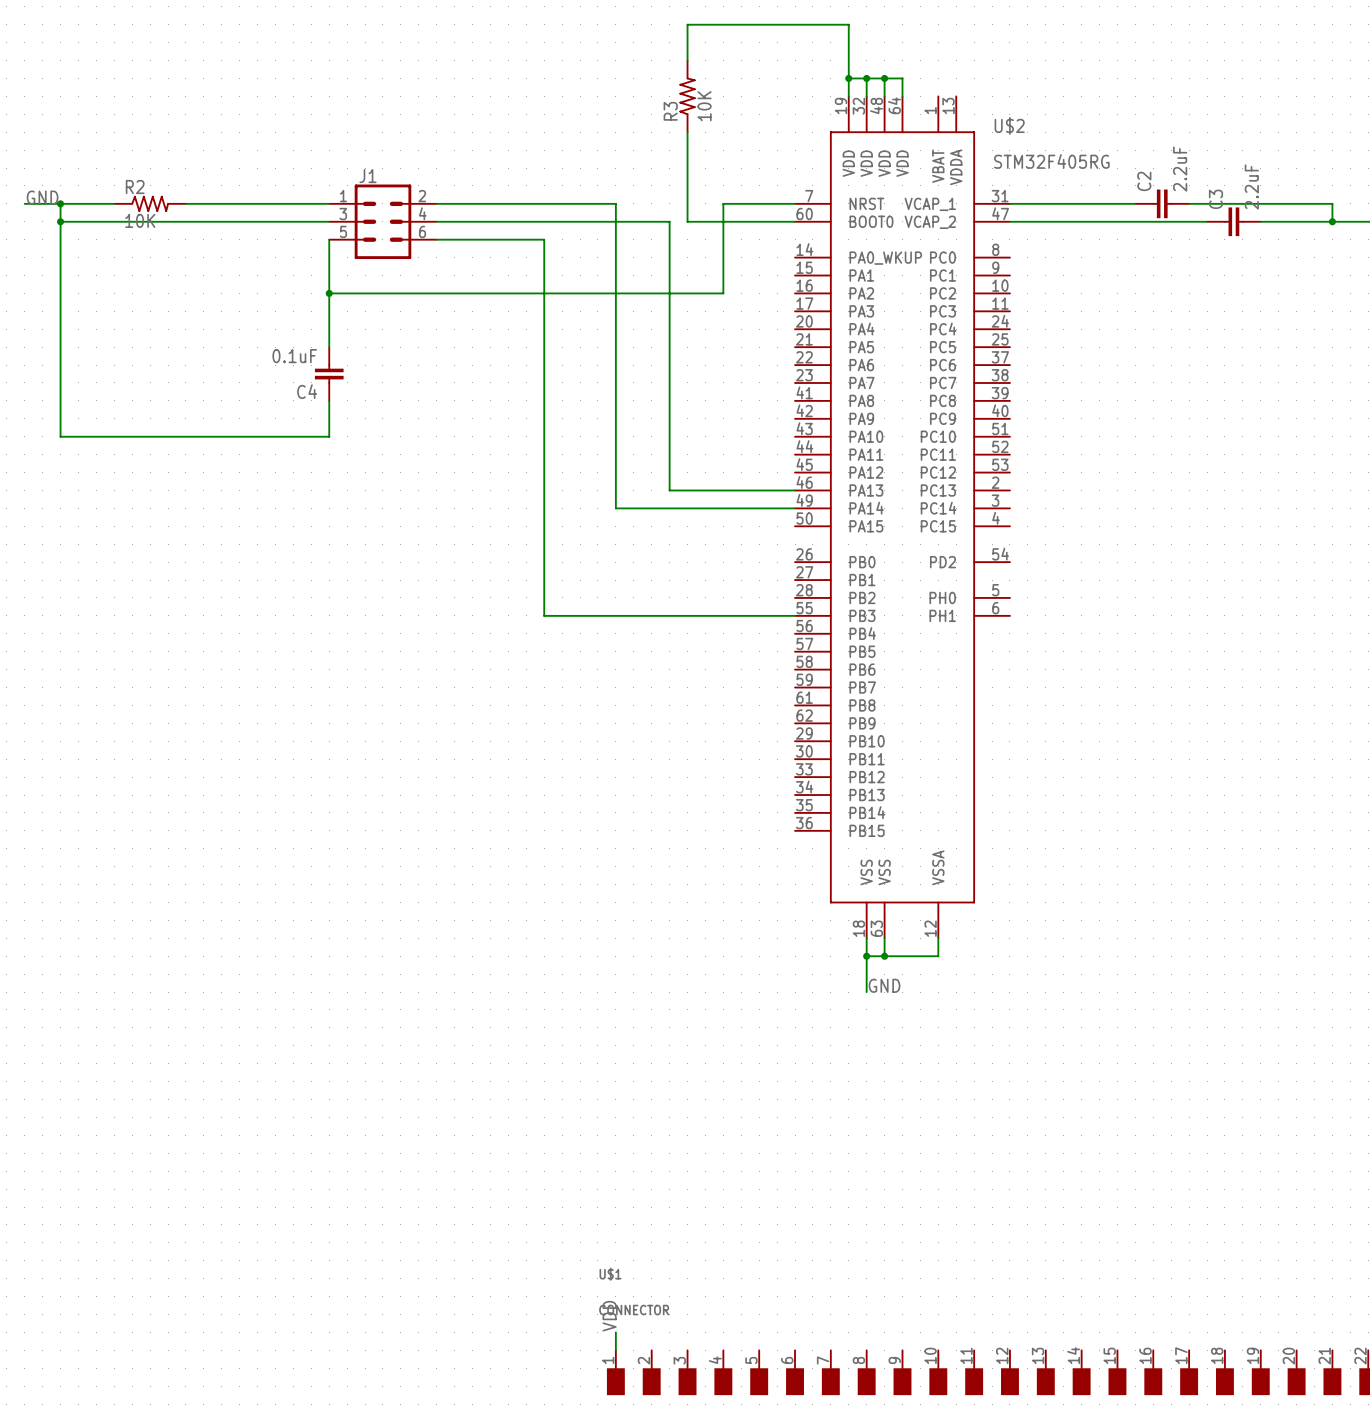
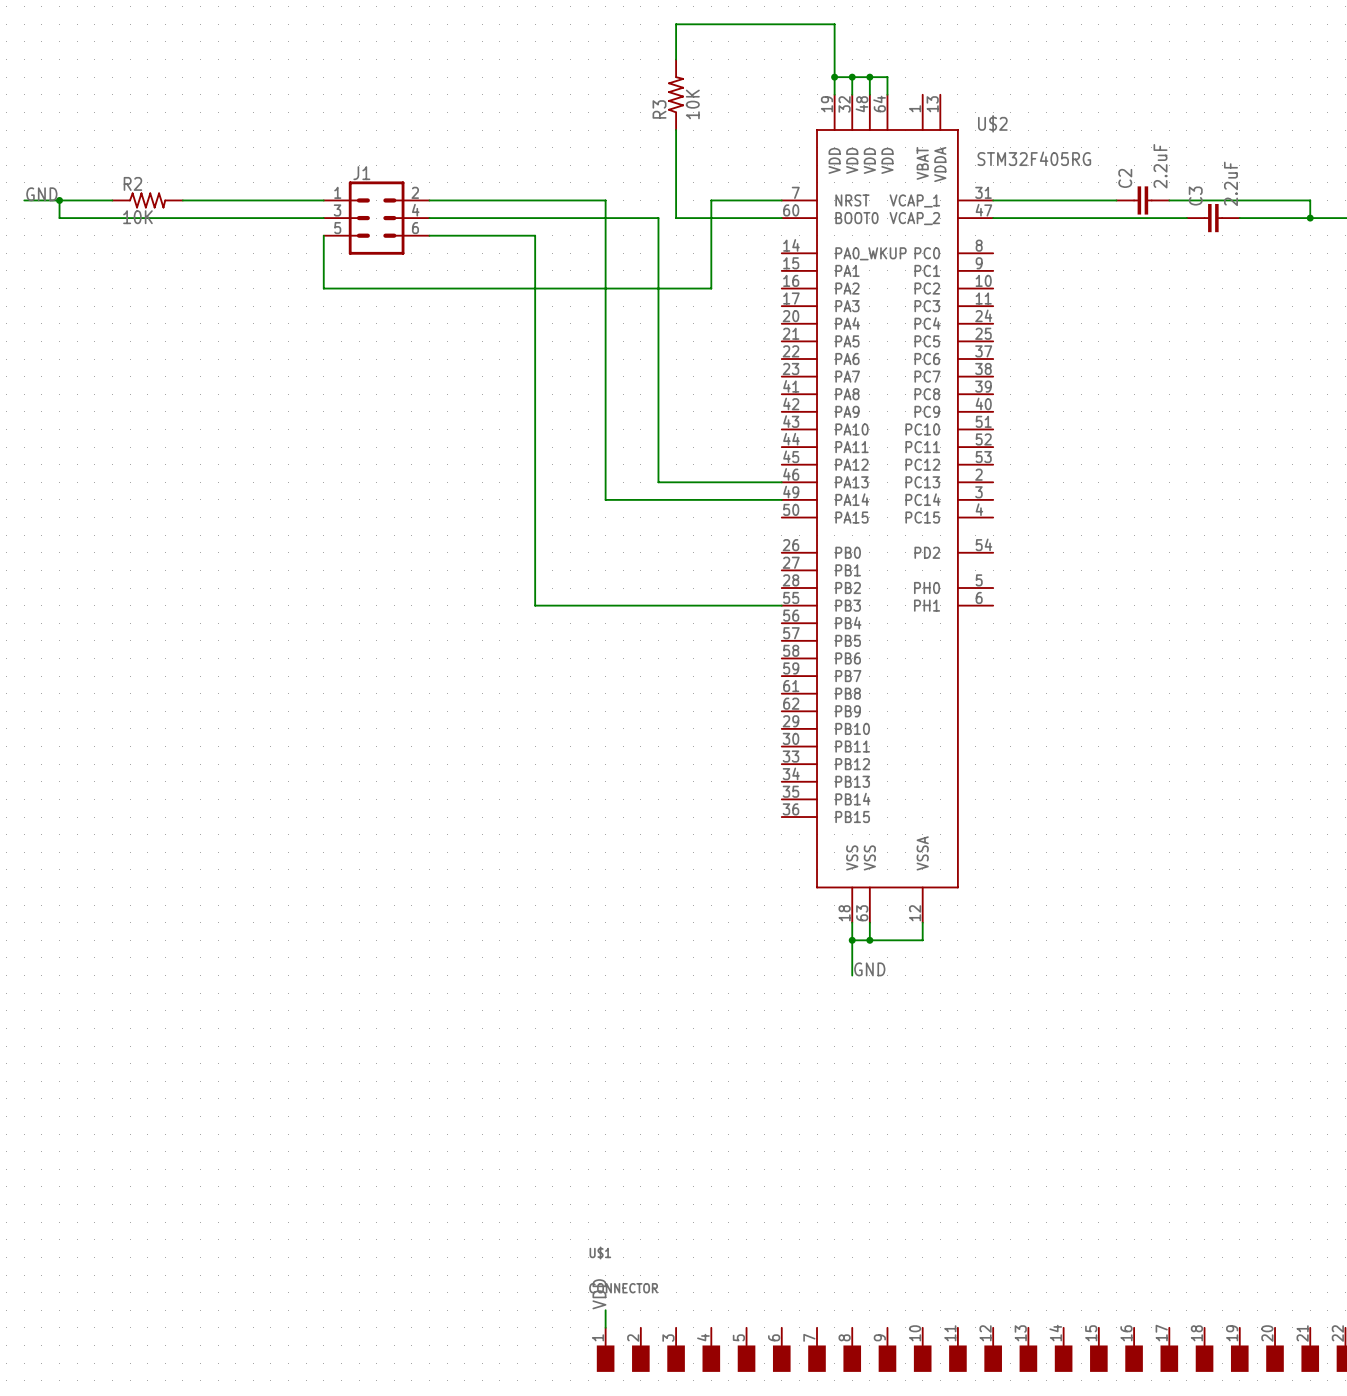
wire: (60, 221) (60, 436) (329, 436) (329, 400) -> none
junction: (60, 221) -> none
wire: (329, 293) (329, 347) -> none
junction: (329, 293) -> none
C4: 0.1uF (329, 374) -> none

